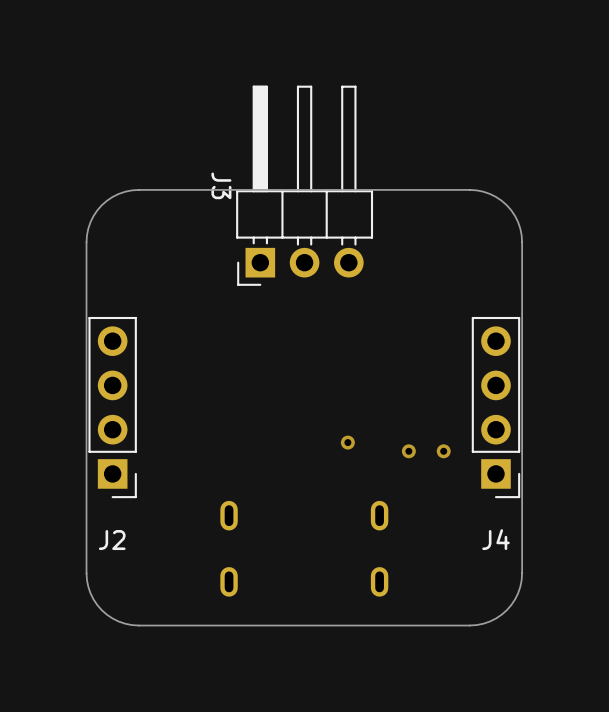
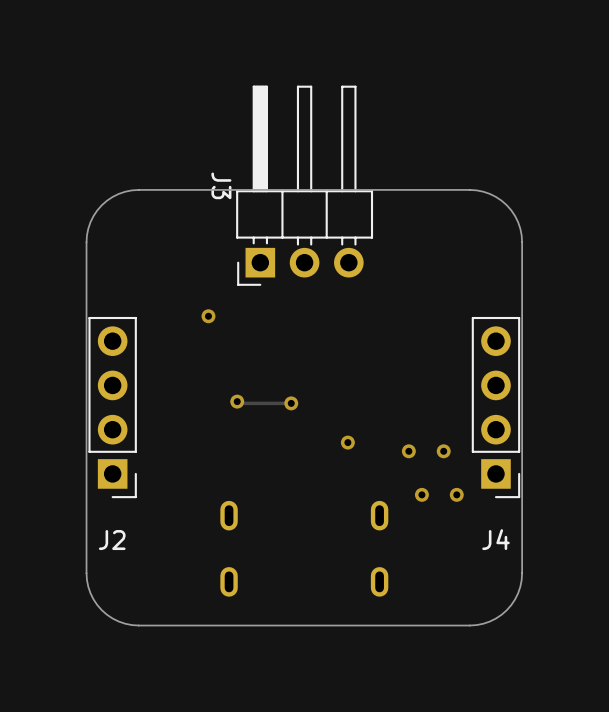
via: none -> (208, 316)
track: none -> (237, 401) (238, 403) (291, 403)
via: none -> (237, 401)
via: none -> (291, 403)
via: none -> (421, 494)
via: none -> (456, 494)

